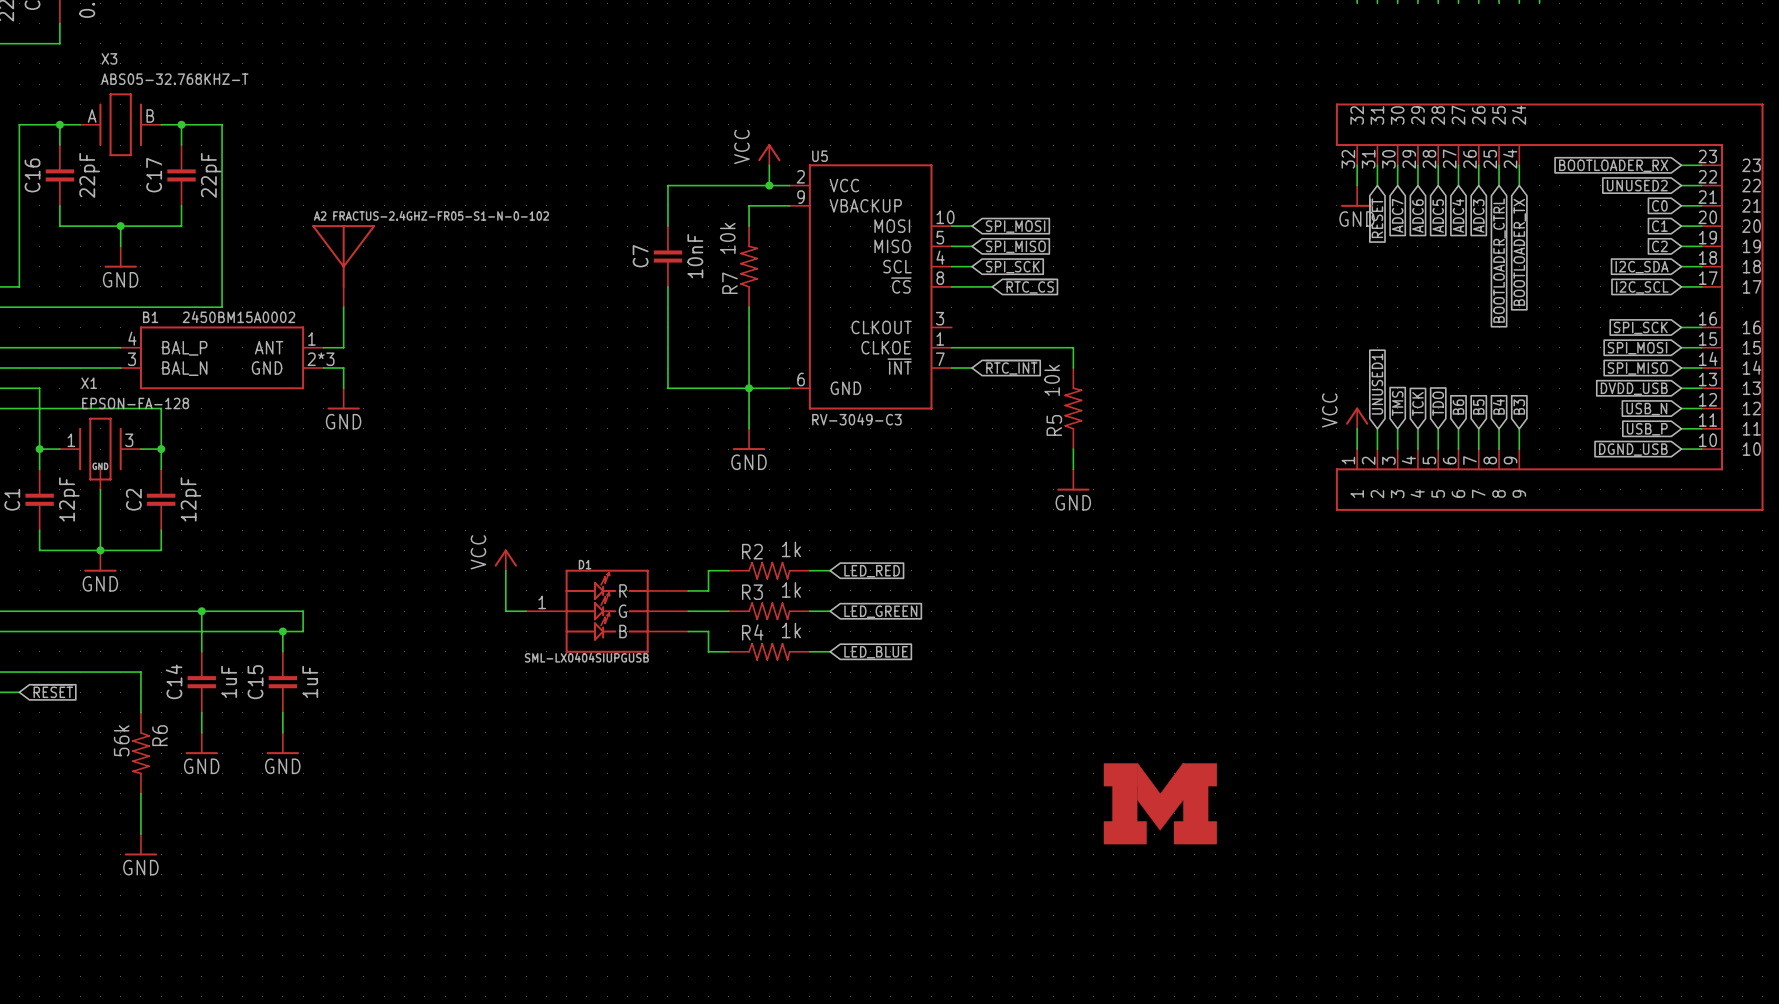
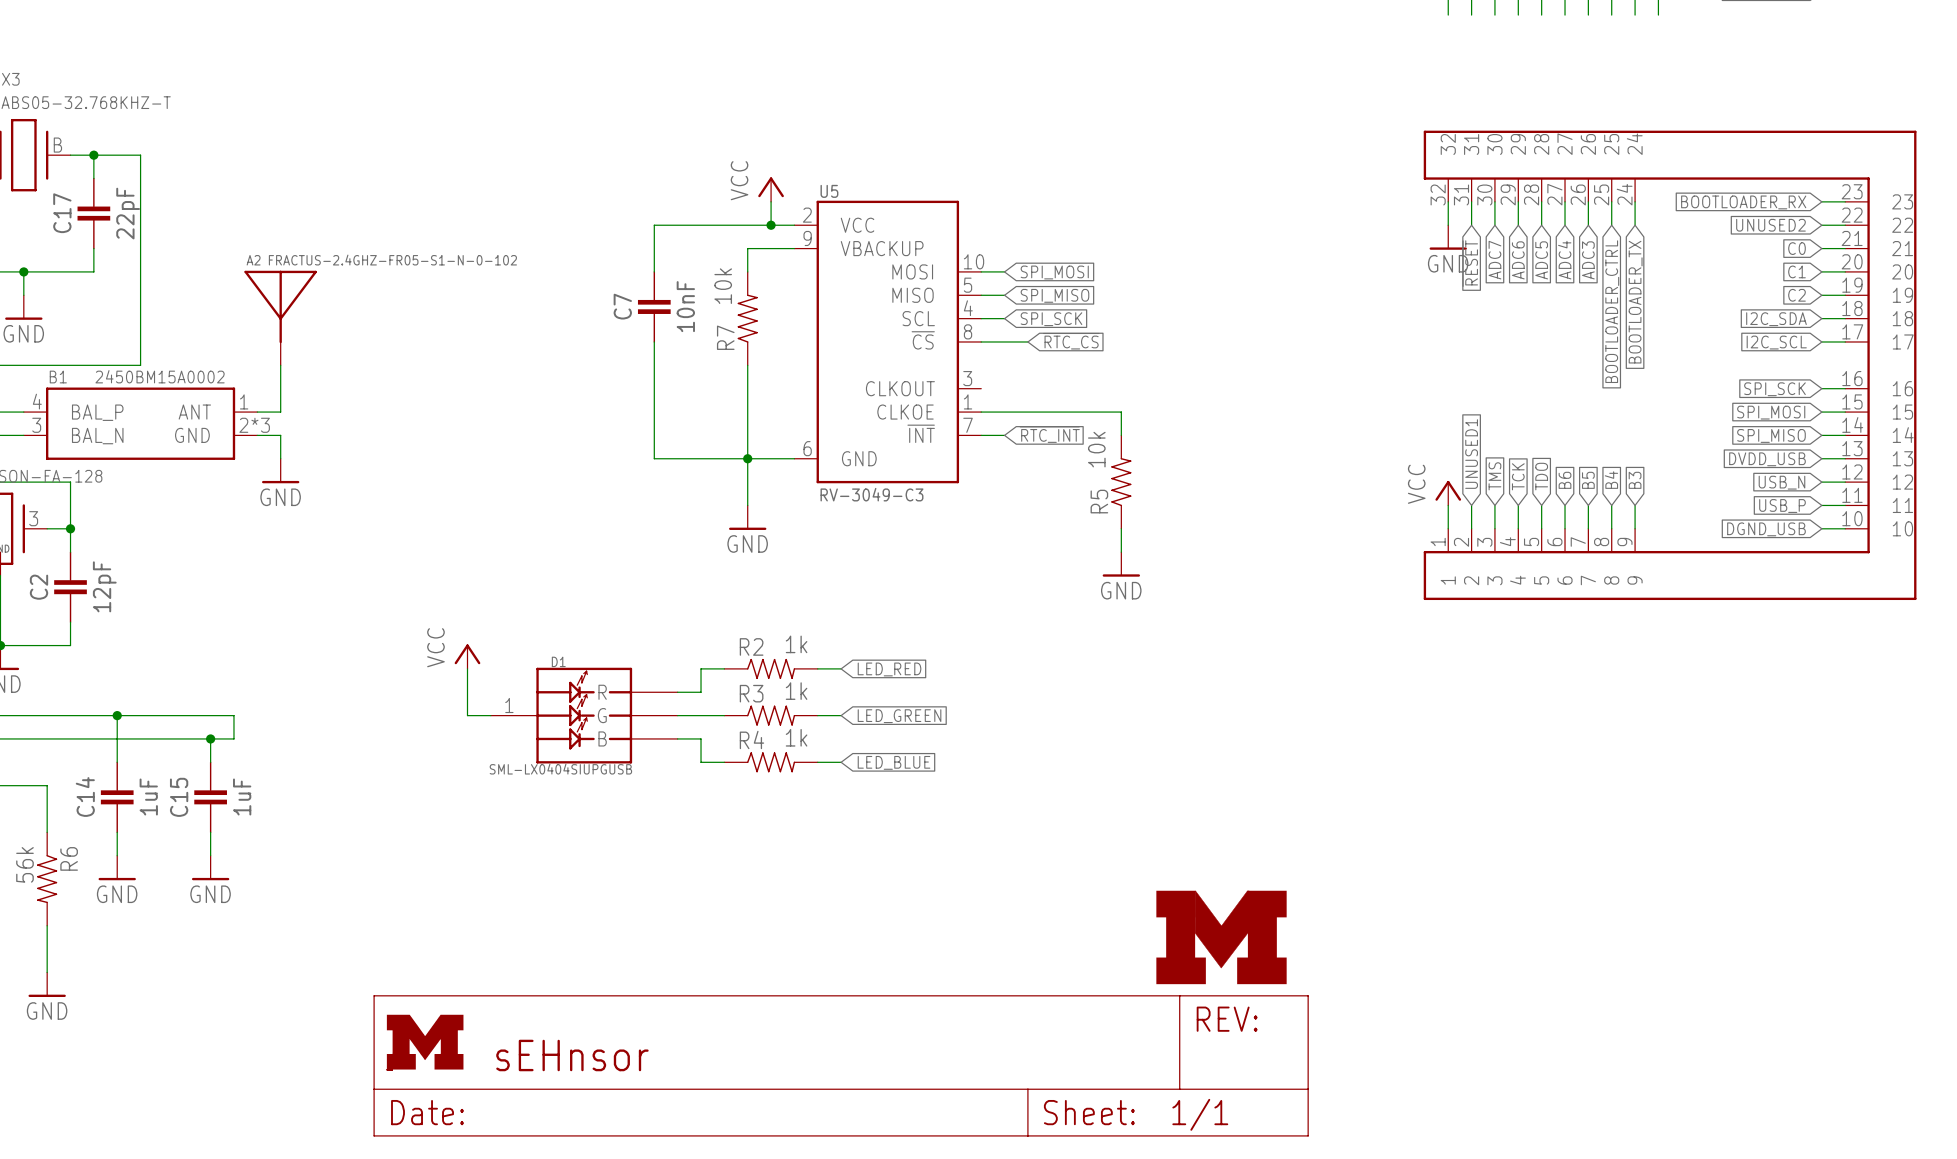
part: none -> (841, 1065)

